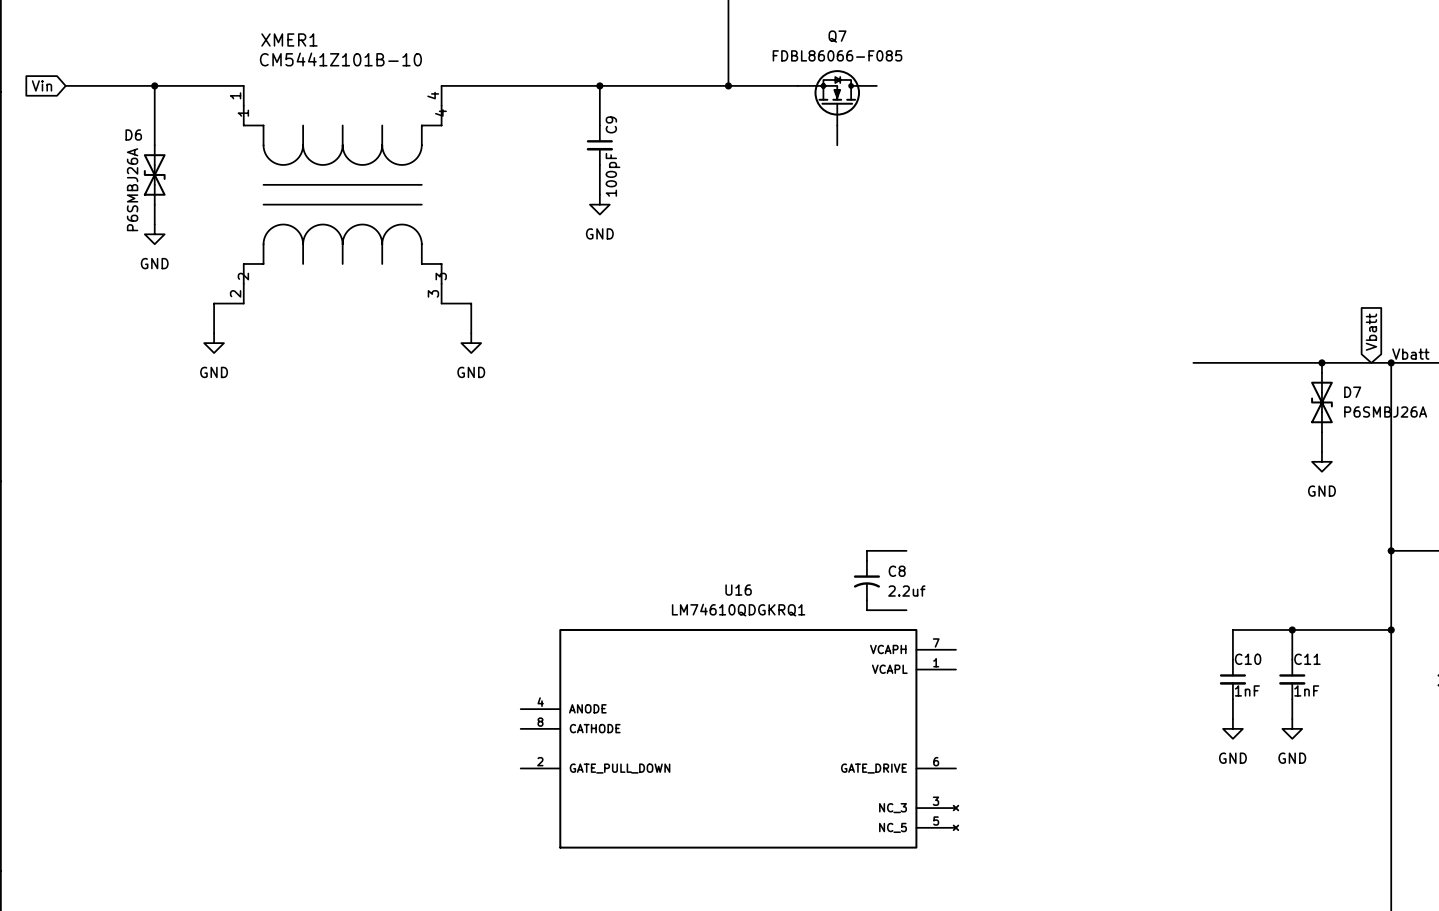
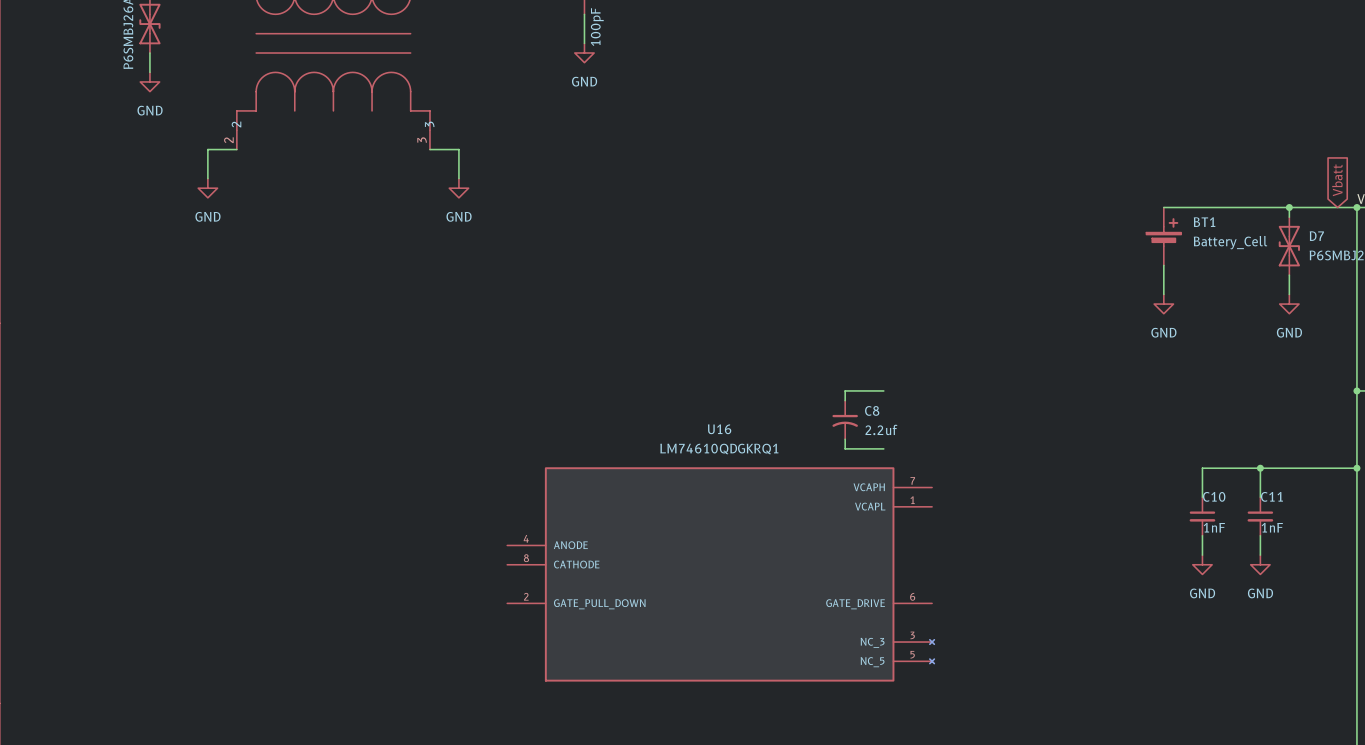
BT1: none -> Battery_Cell (1163, 236)
wire: none -> (1163, 265) (1163, 294)
power symbol: none -> GND (1163, 304)

